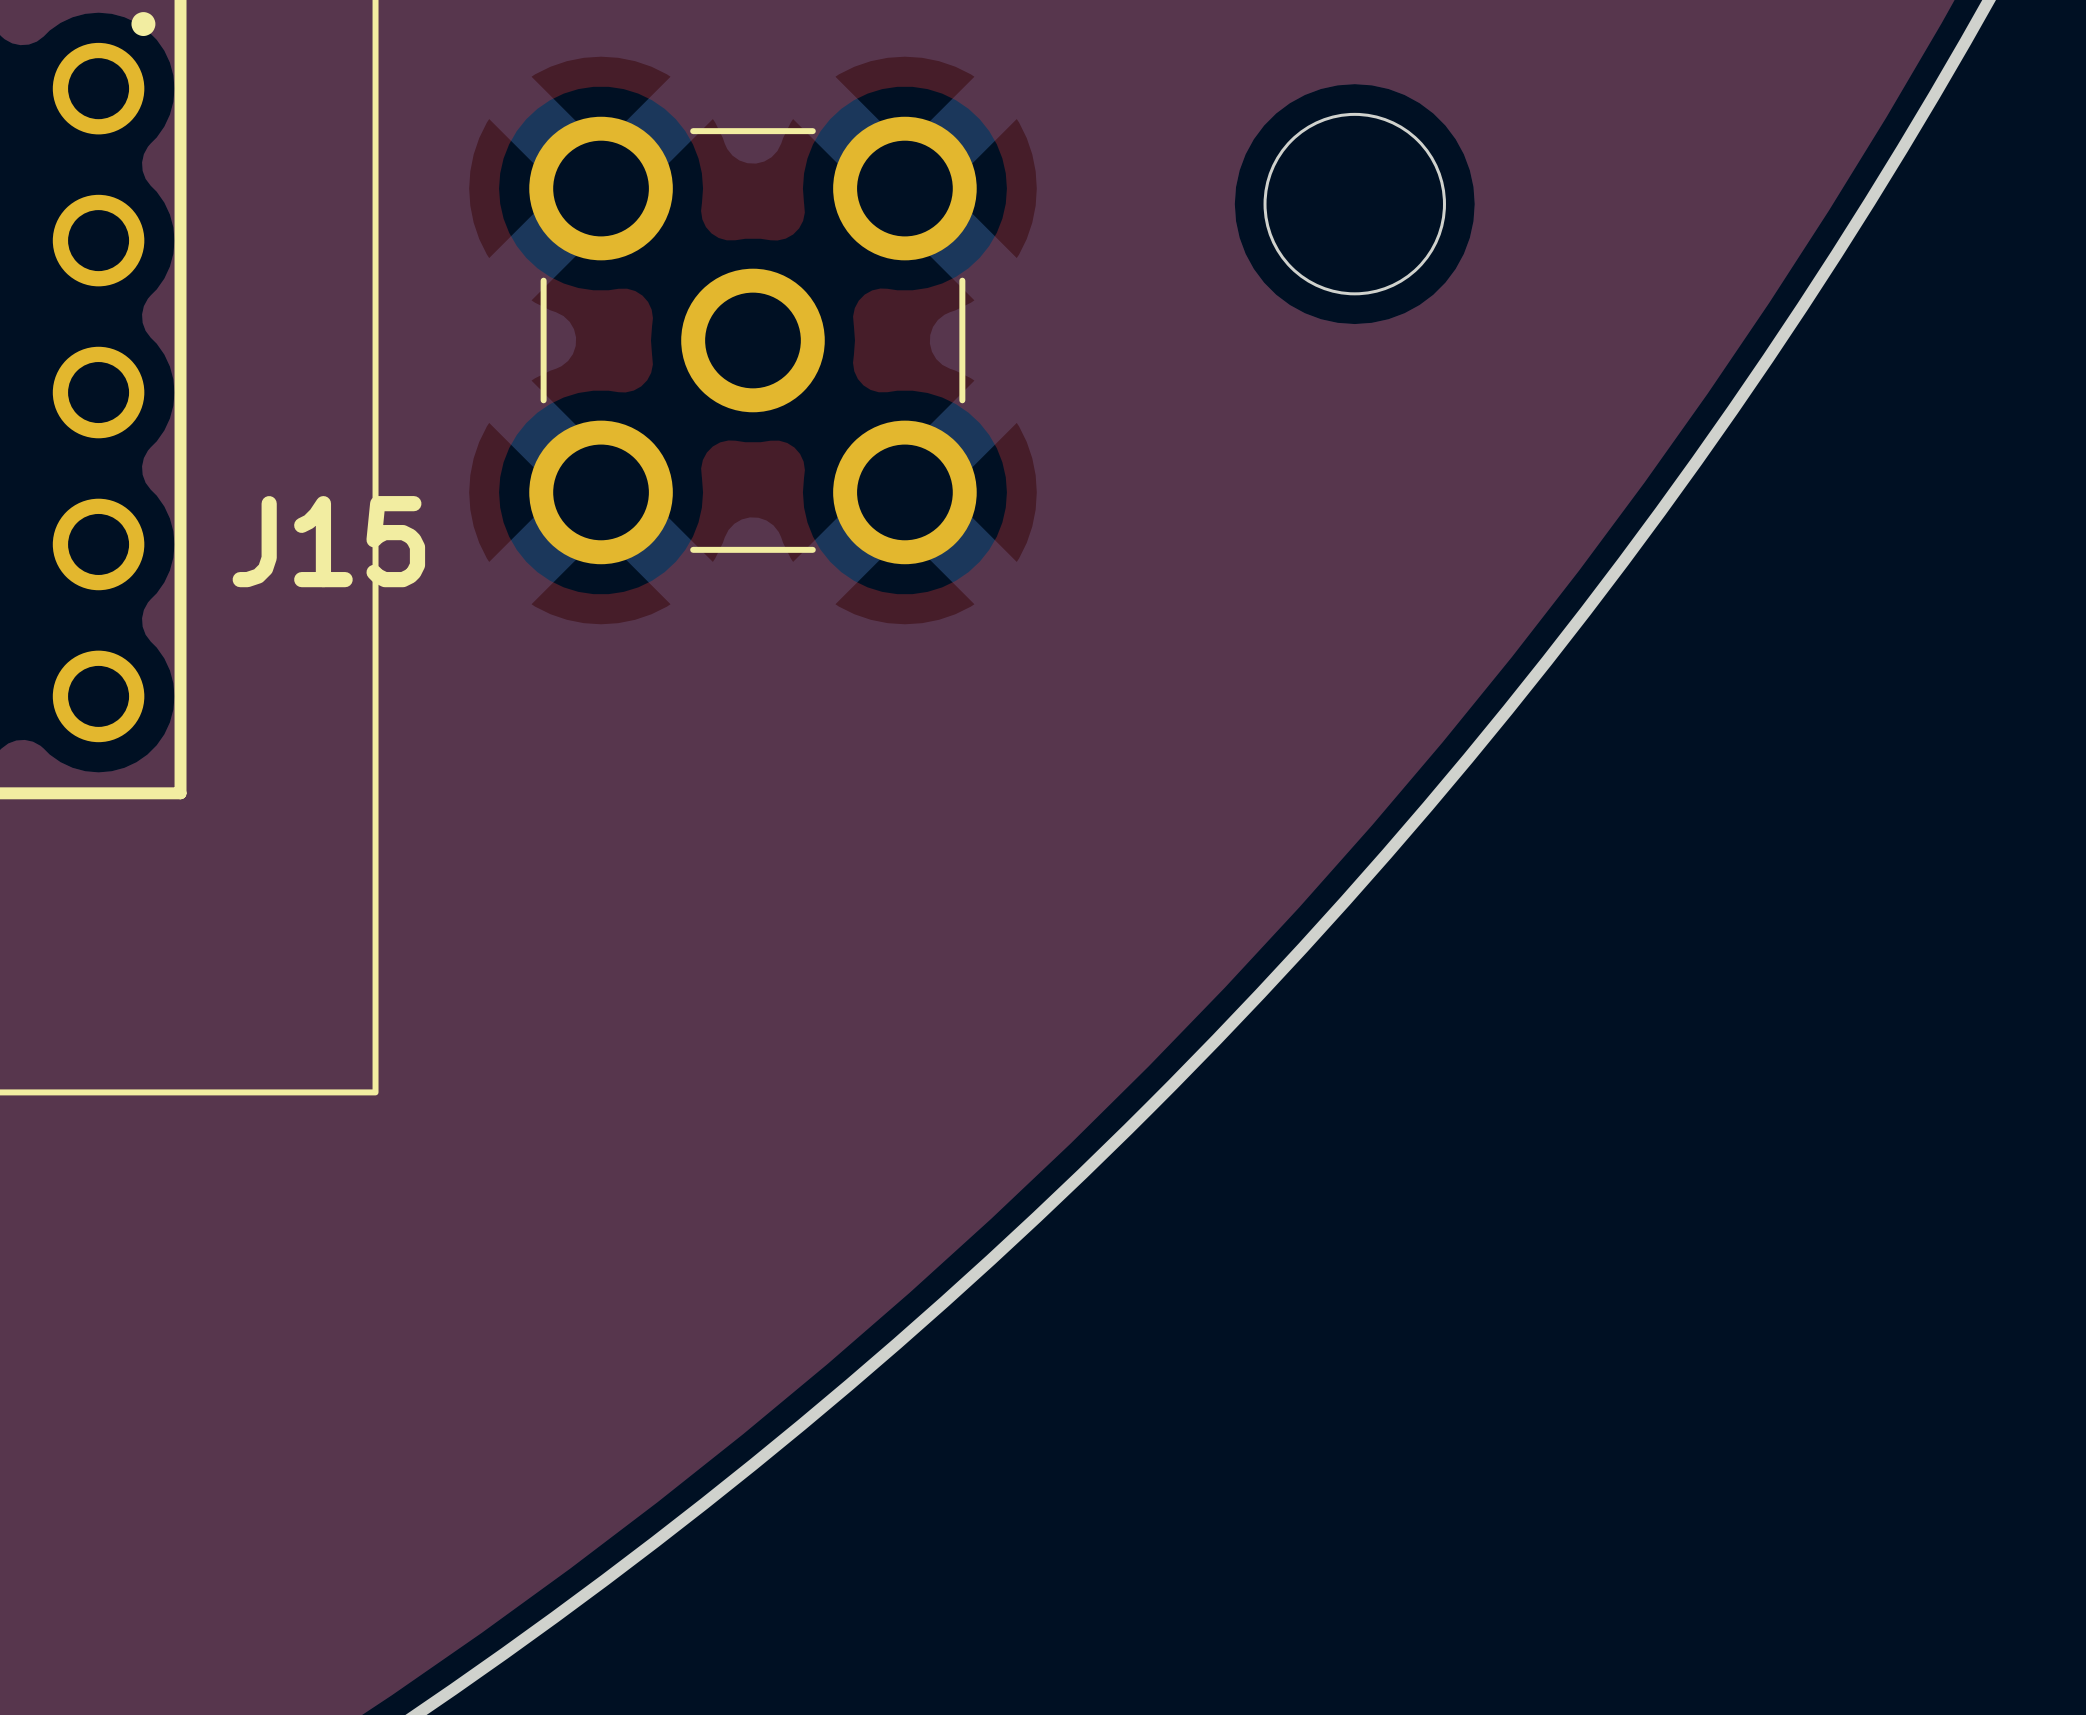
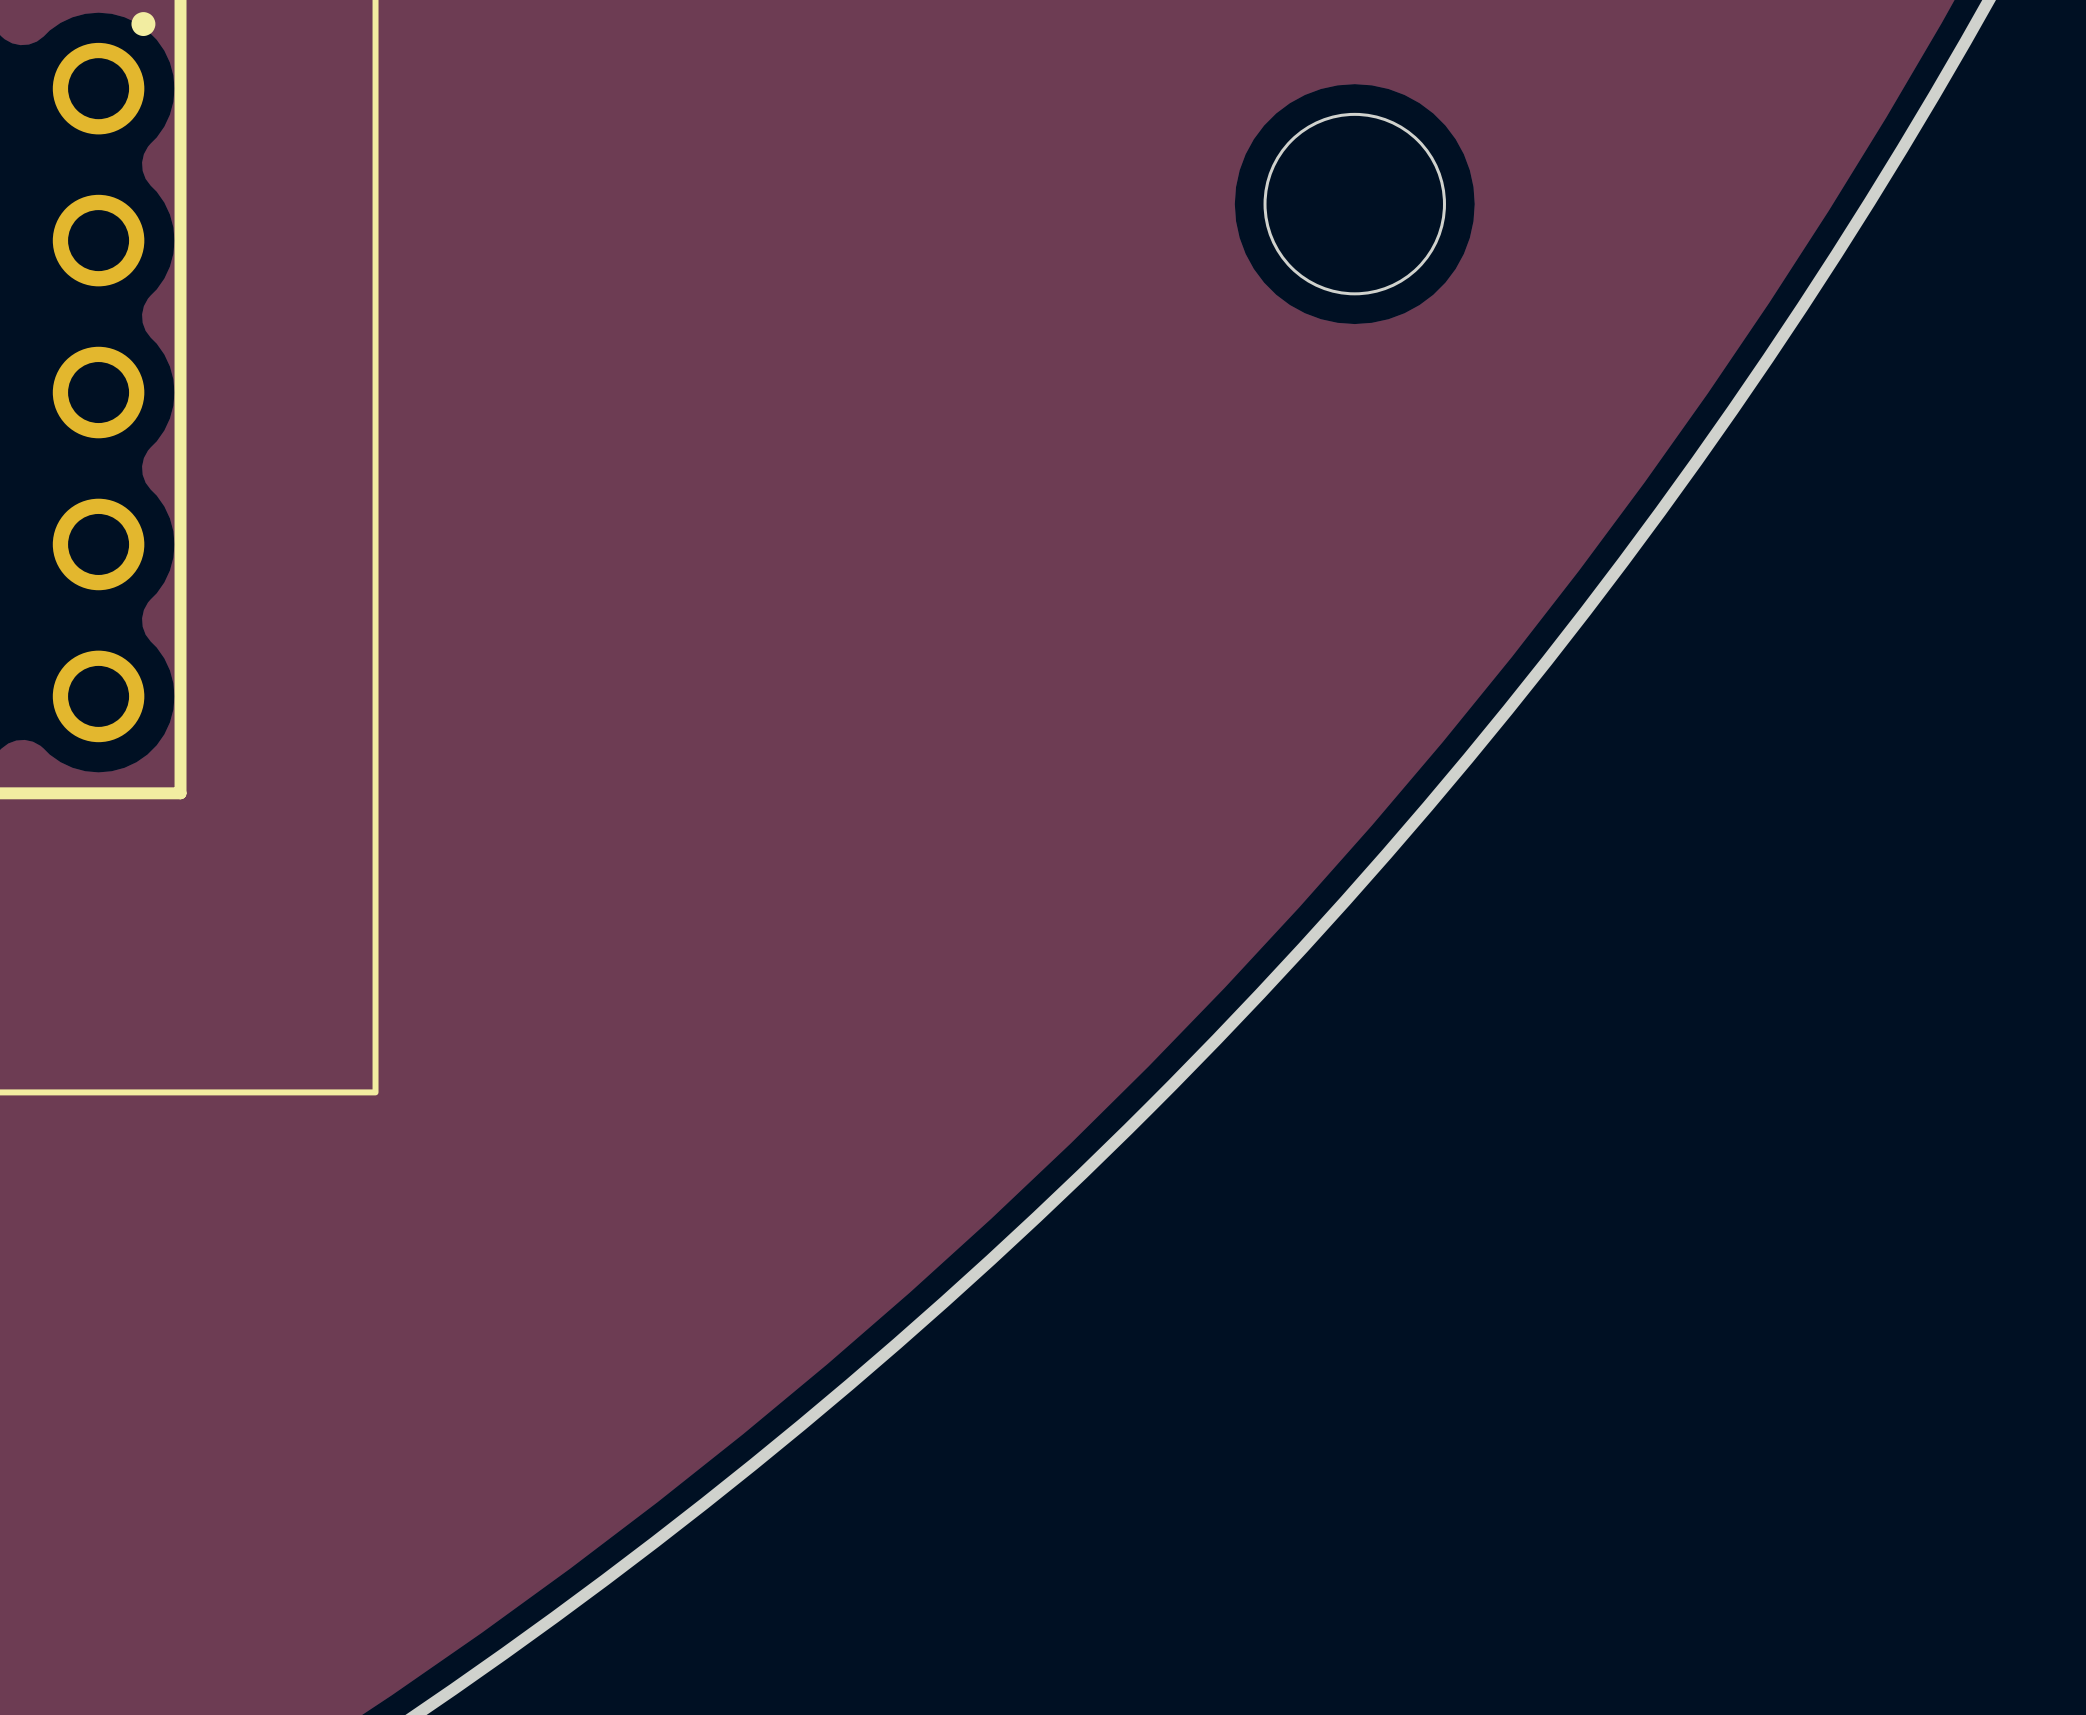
J15: (752, 340) -> none

